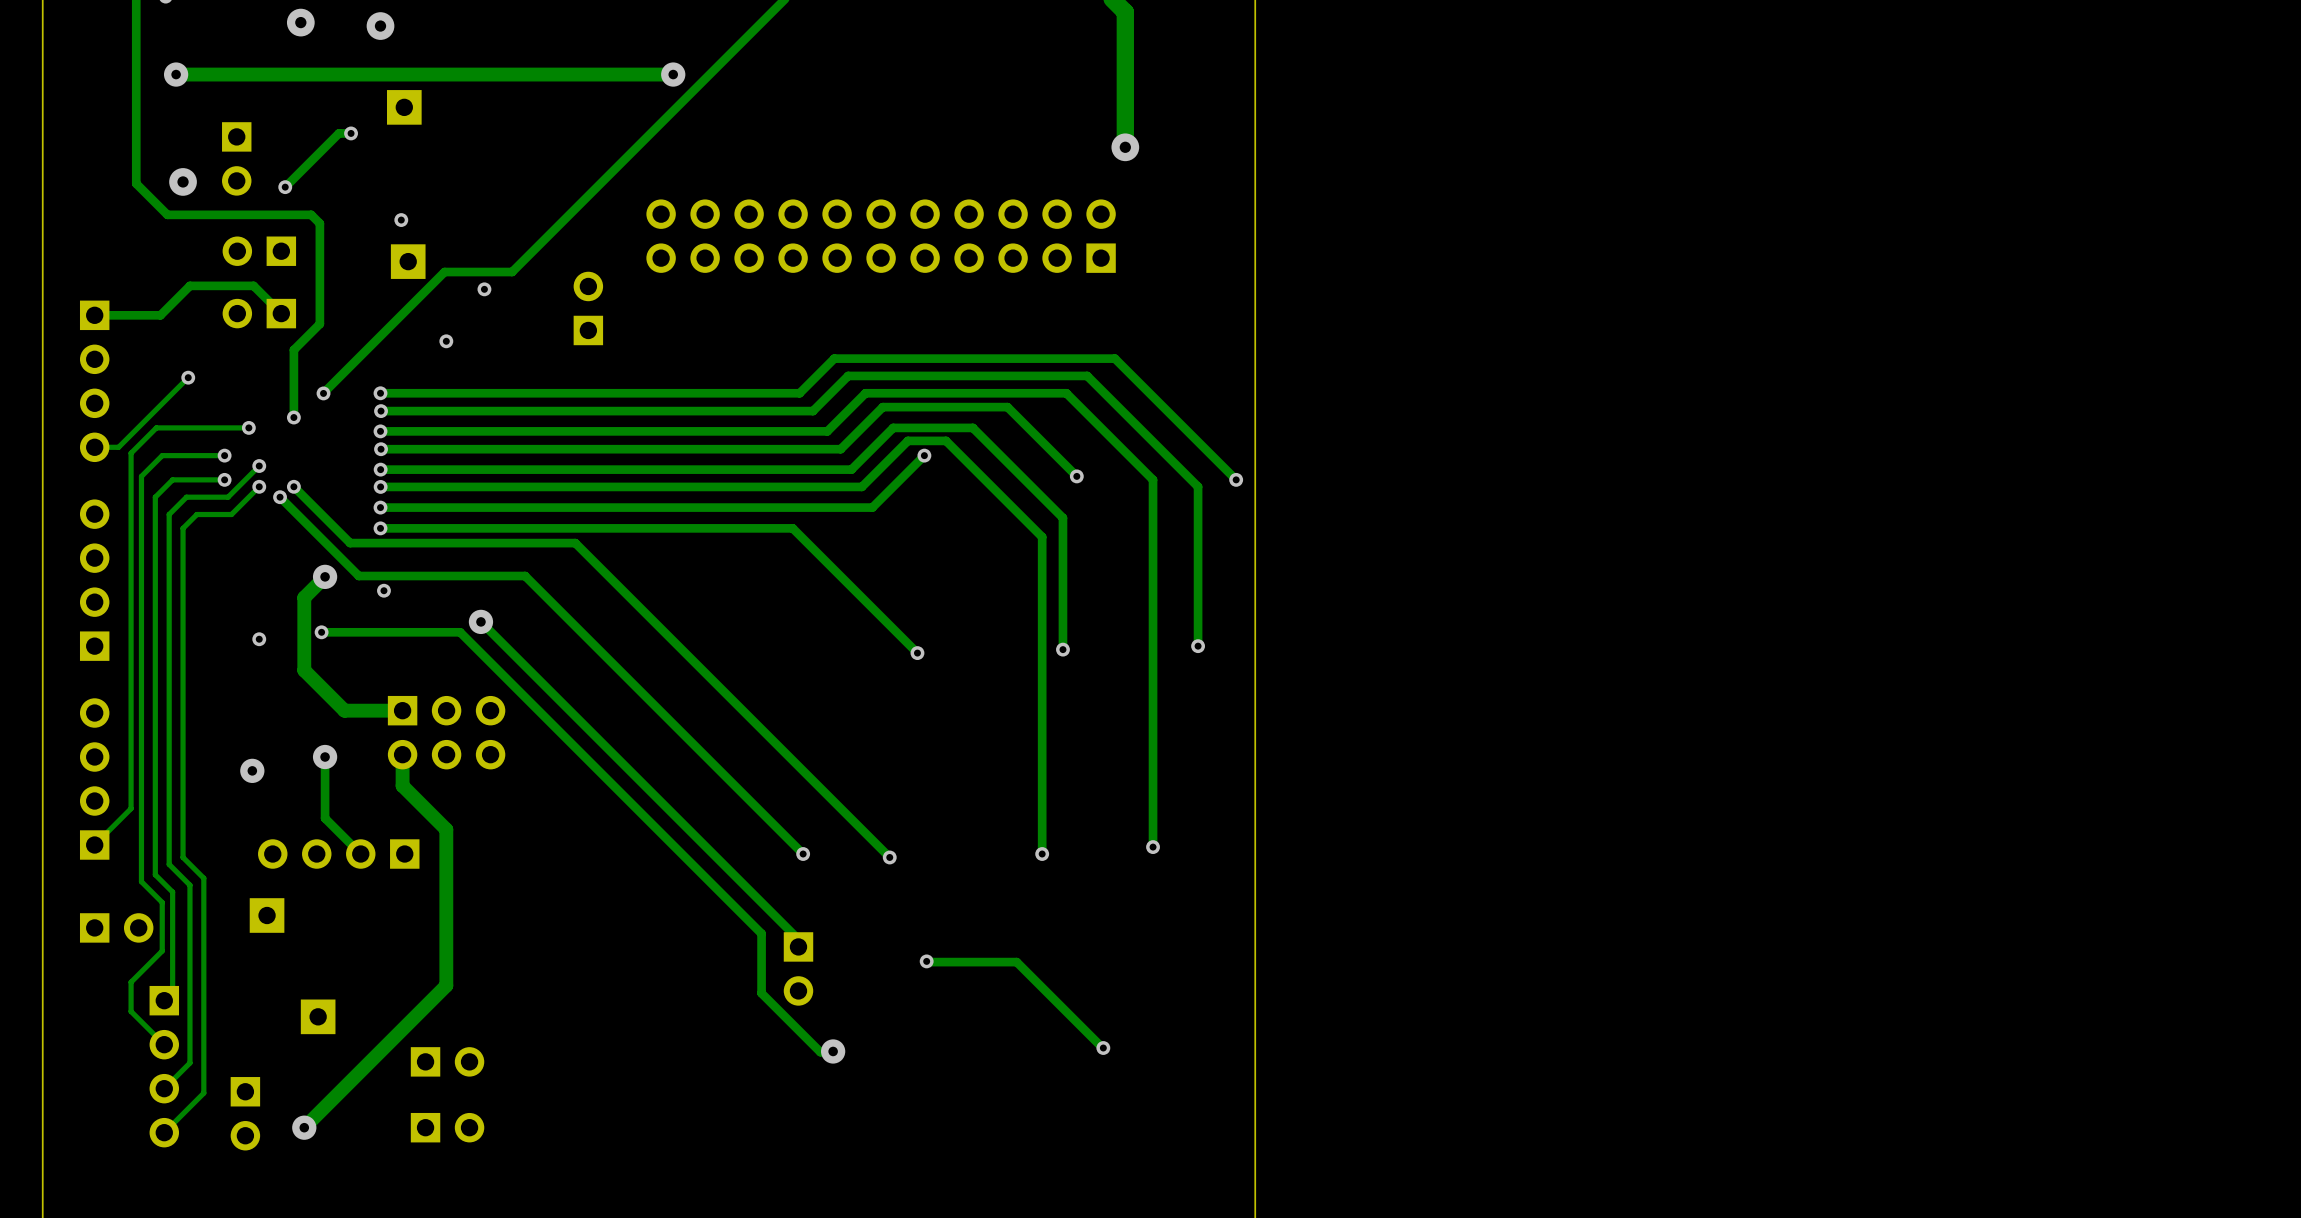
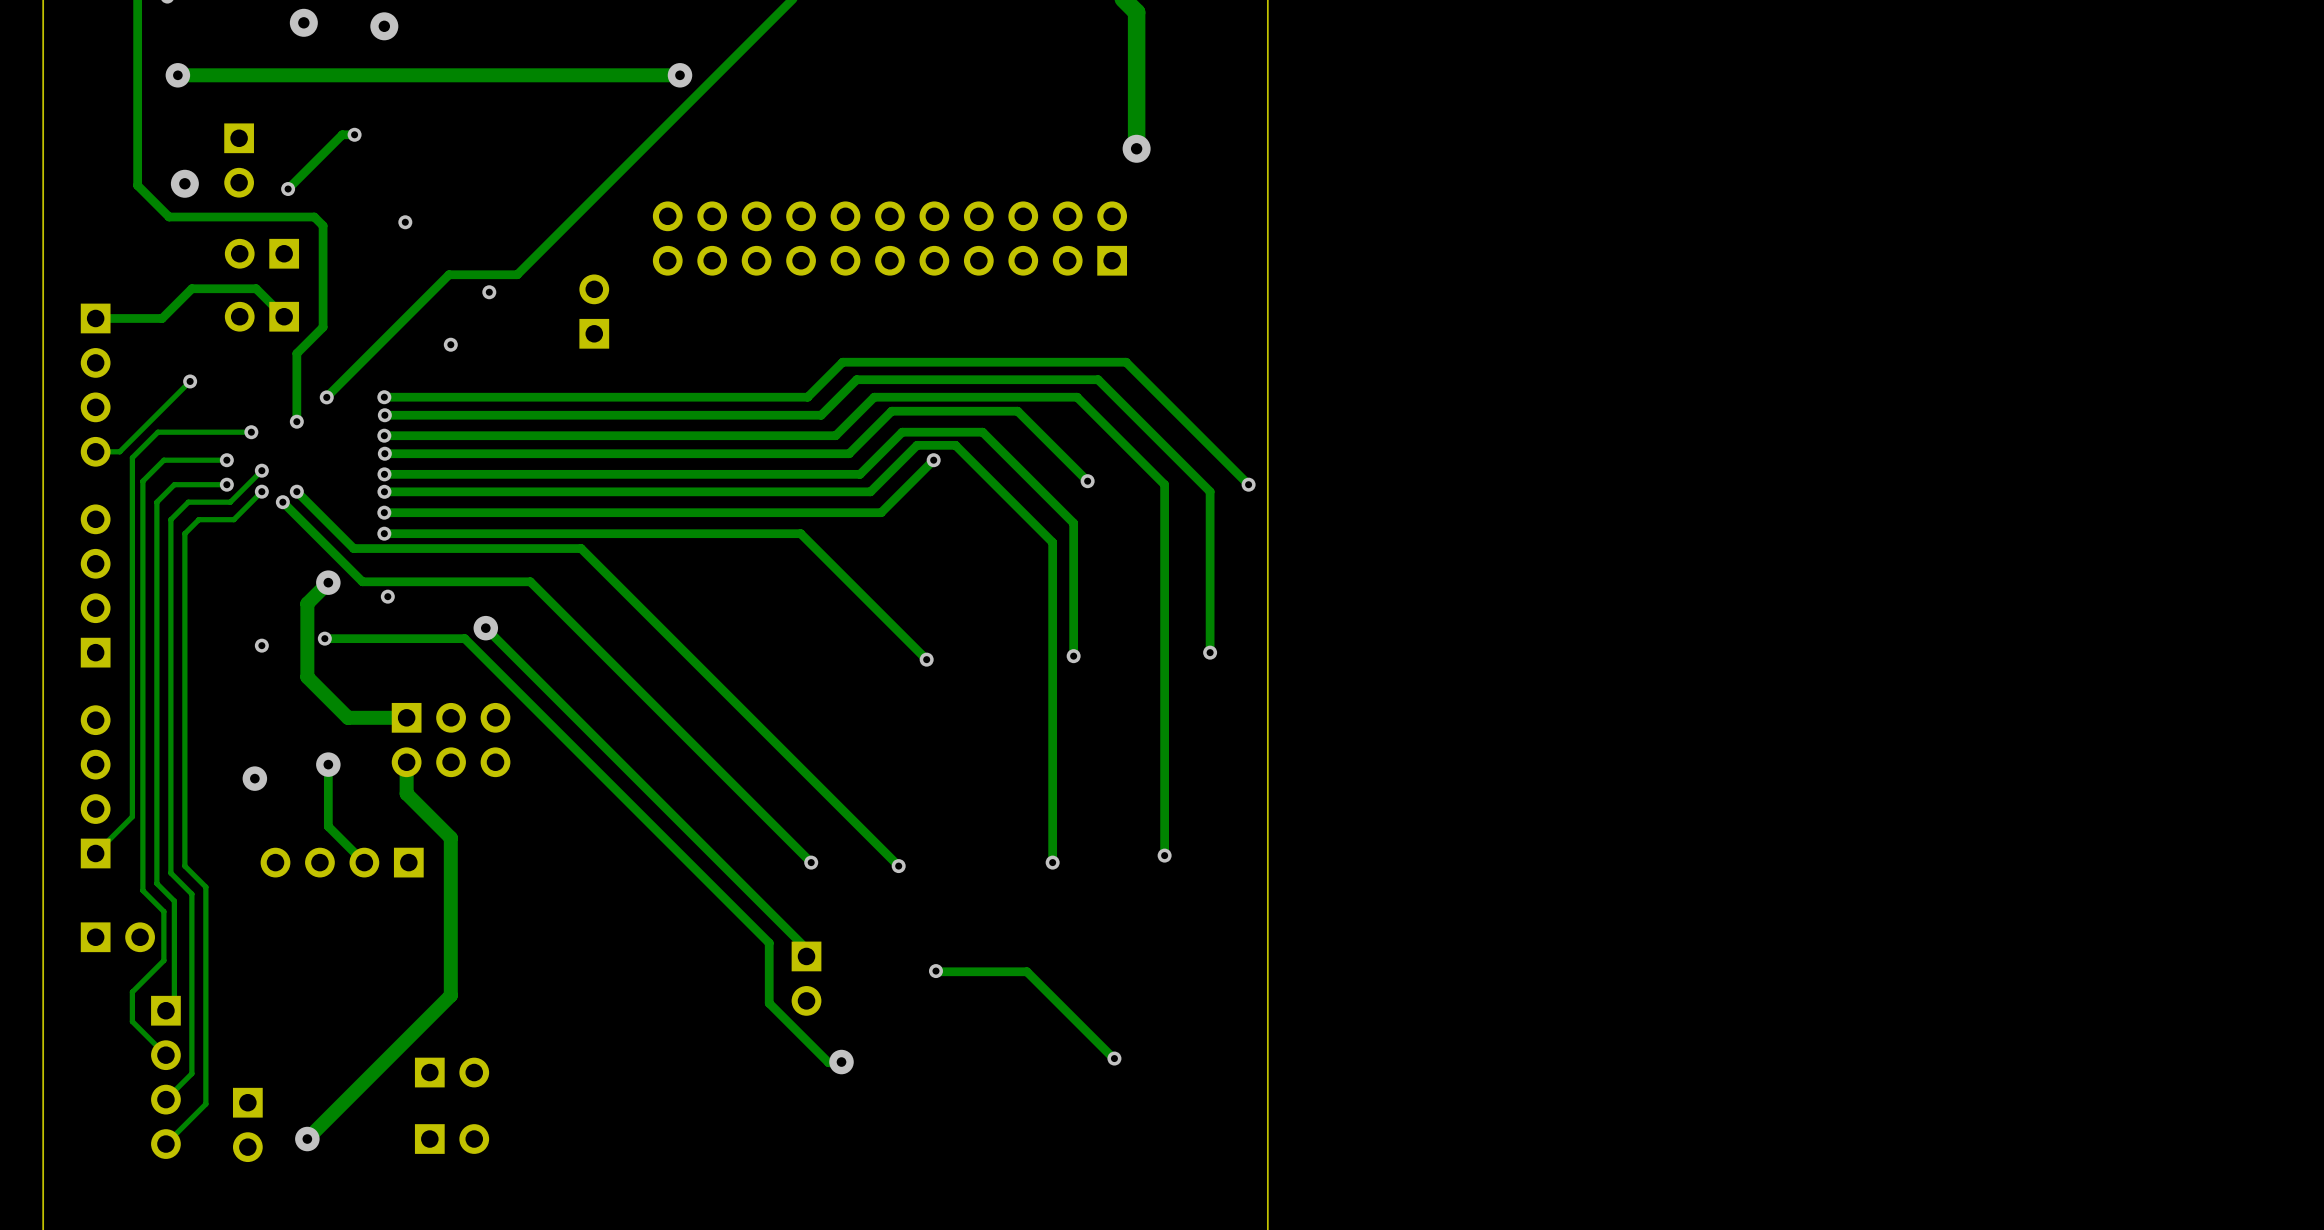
part: (404, 107) -> none
part: (408, 261) -> none
part: (267, 915) -> none
part: (318, 1016) -> none

